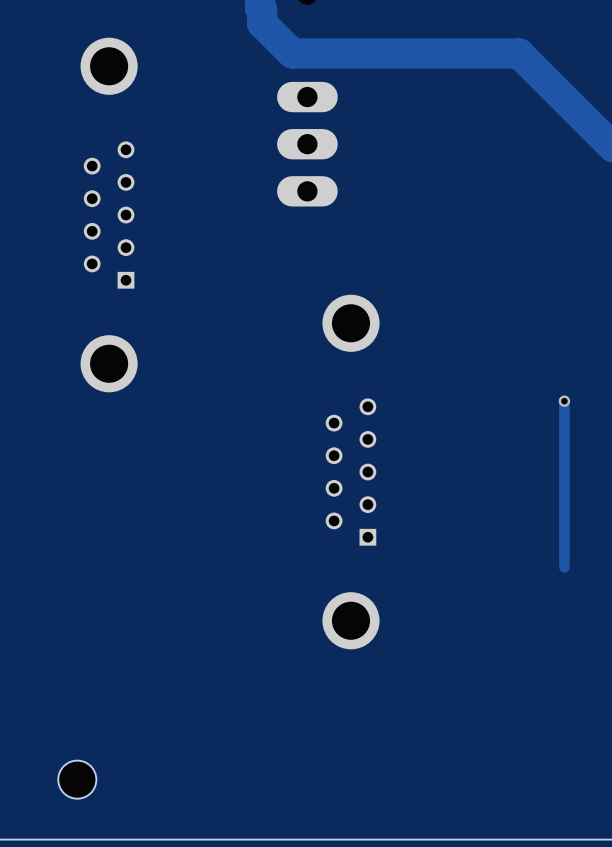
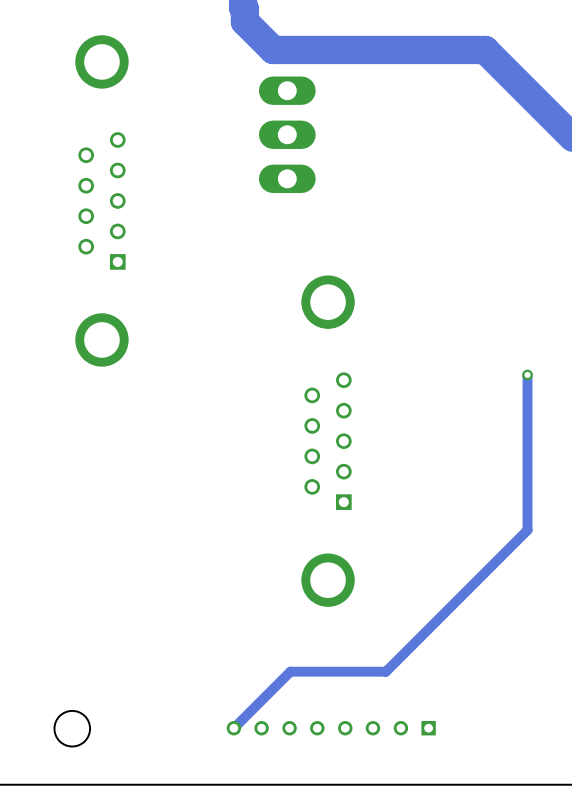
track: none -> (527, 530) (386, 671) (290, 671) (233, 728)
part: none -> (331, 728)

